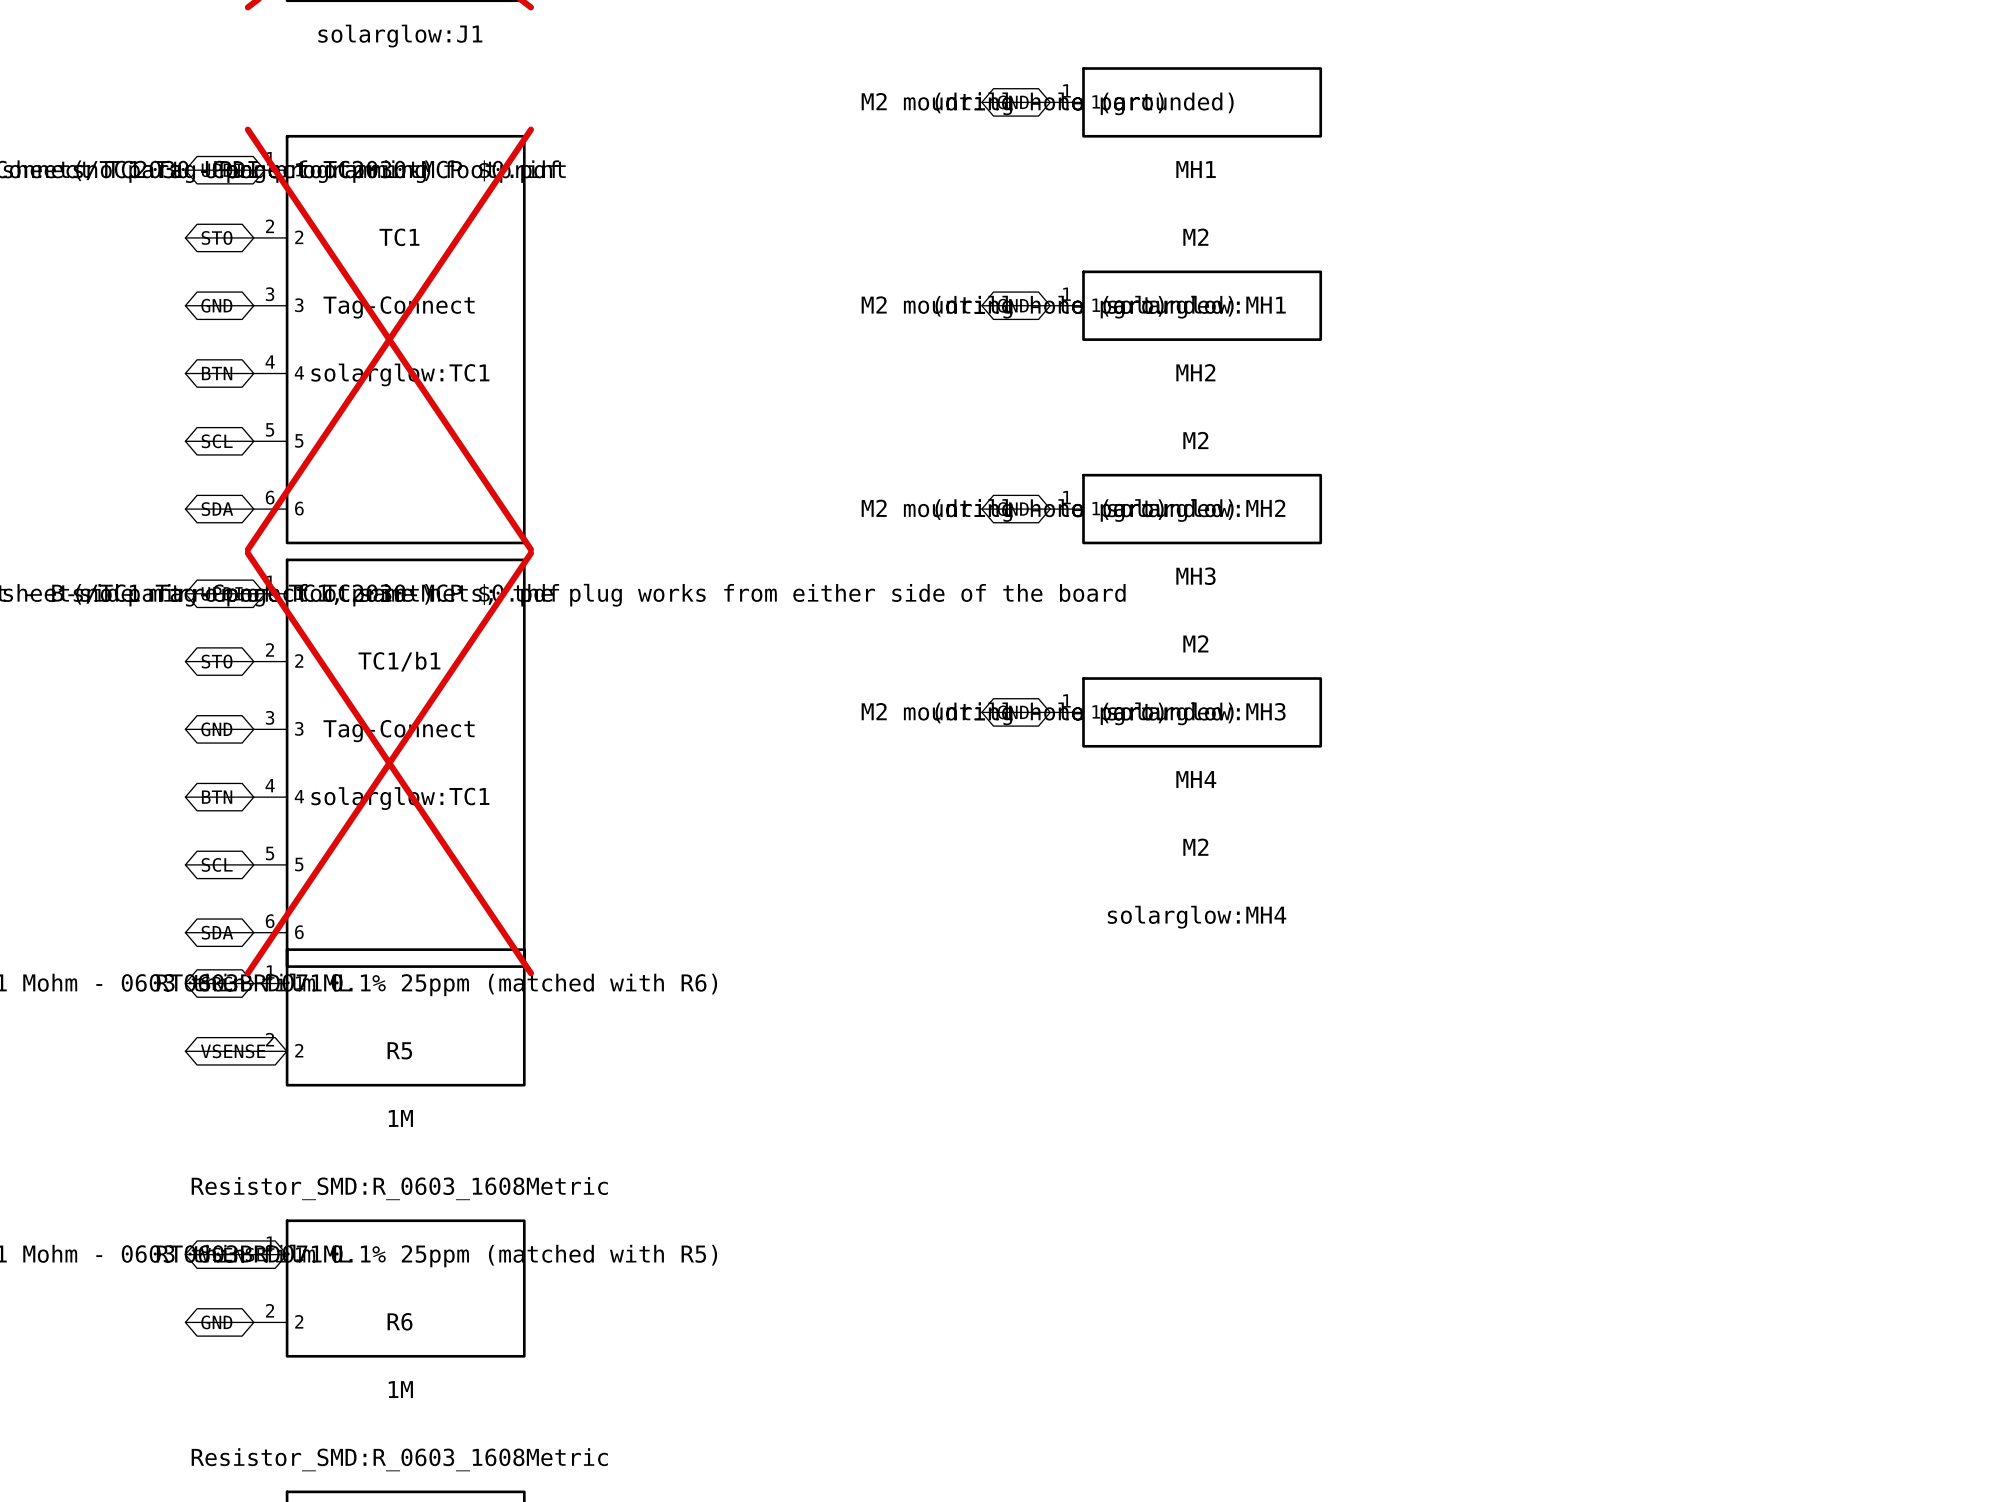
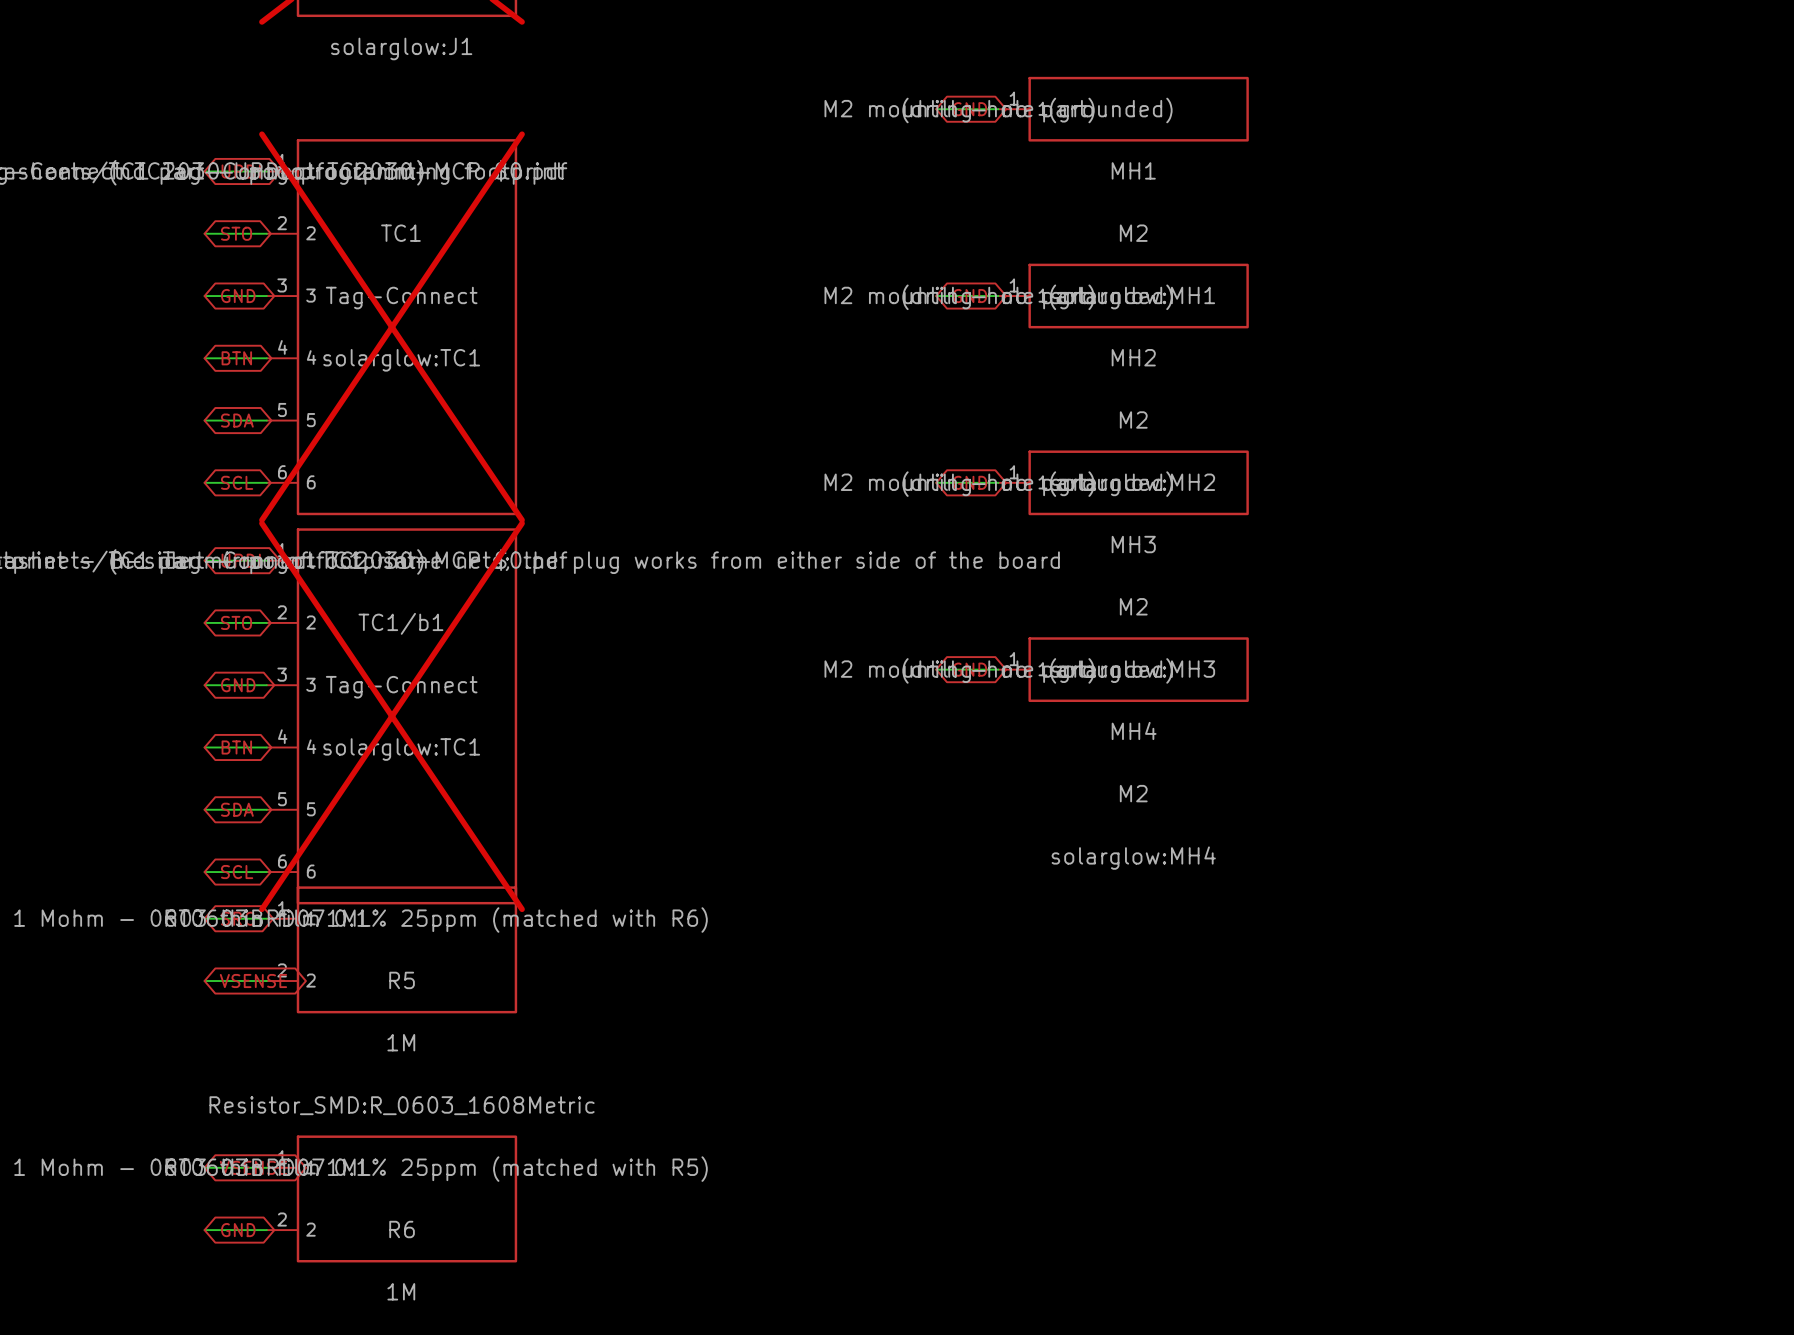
global label: SCL (217, 441) -> SDA (237, 420)
global label: SDA (217, 509) -> SCL (237, 482)
global label: SCL (217, 864) -> SDA (237, 809)
global label: SDA (217, 932) -> SCL (237, 872)

